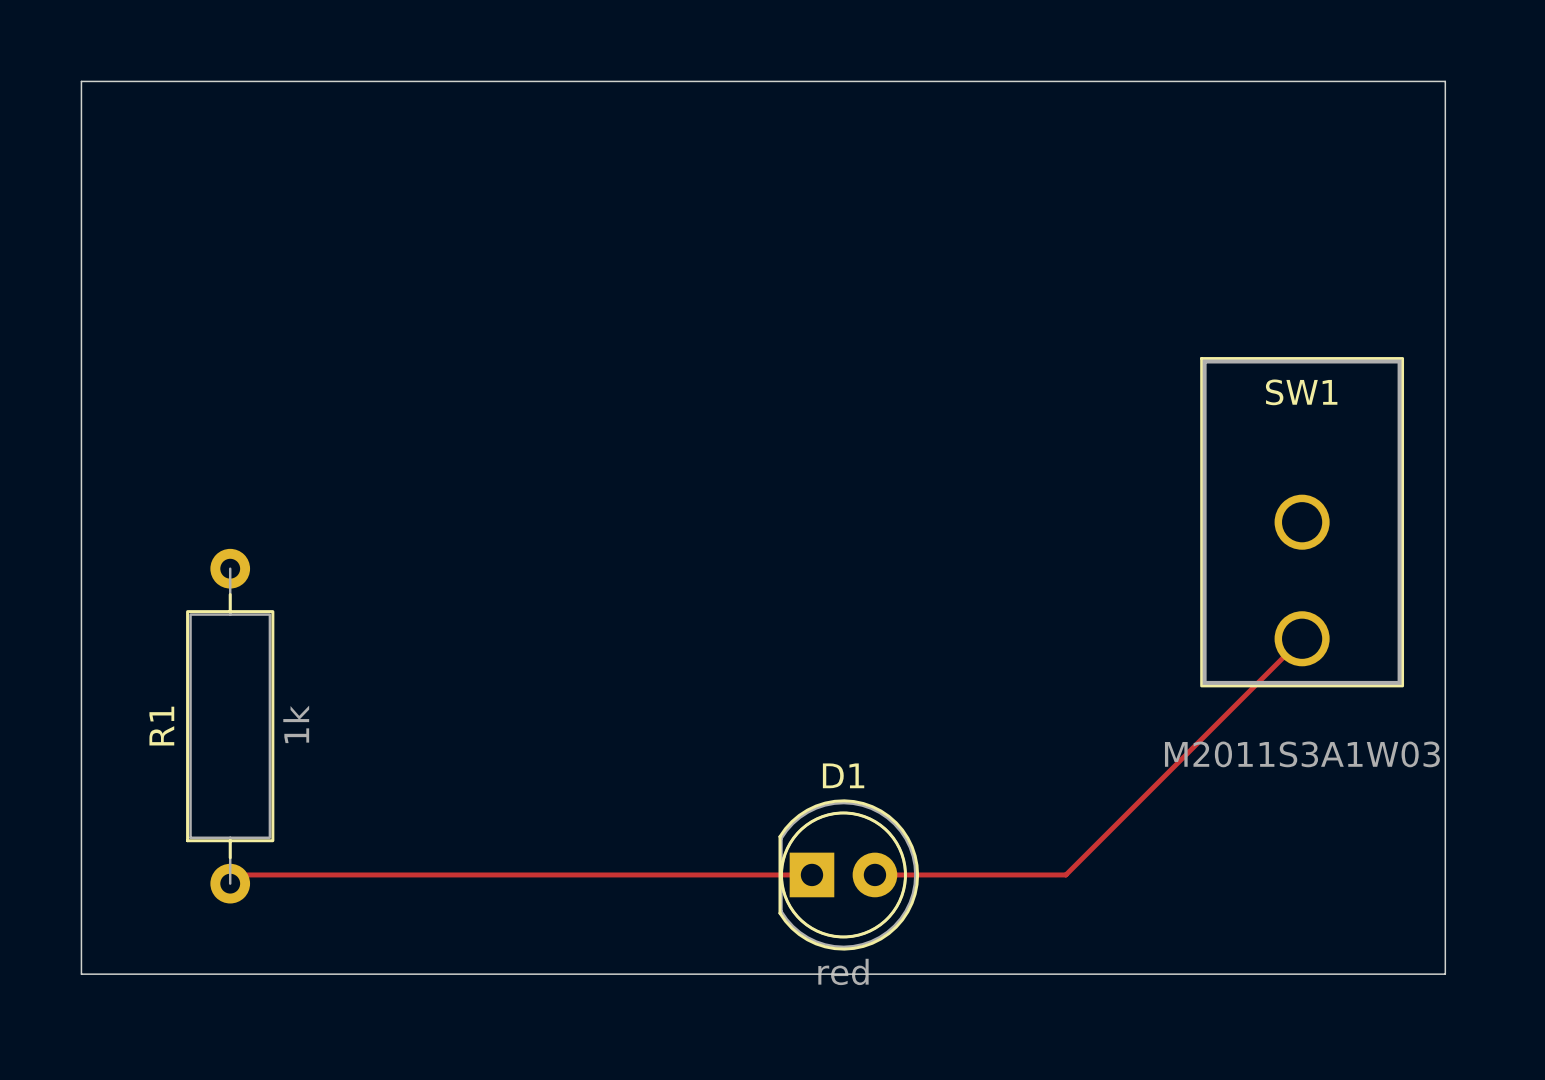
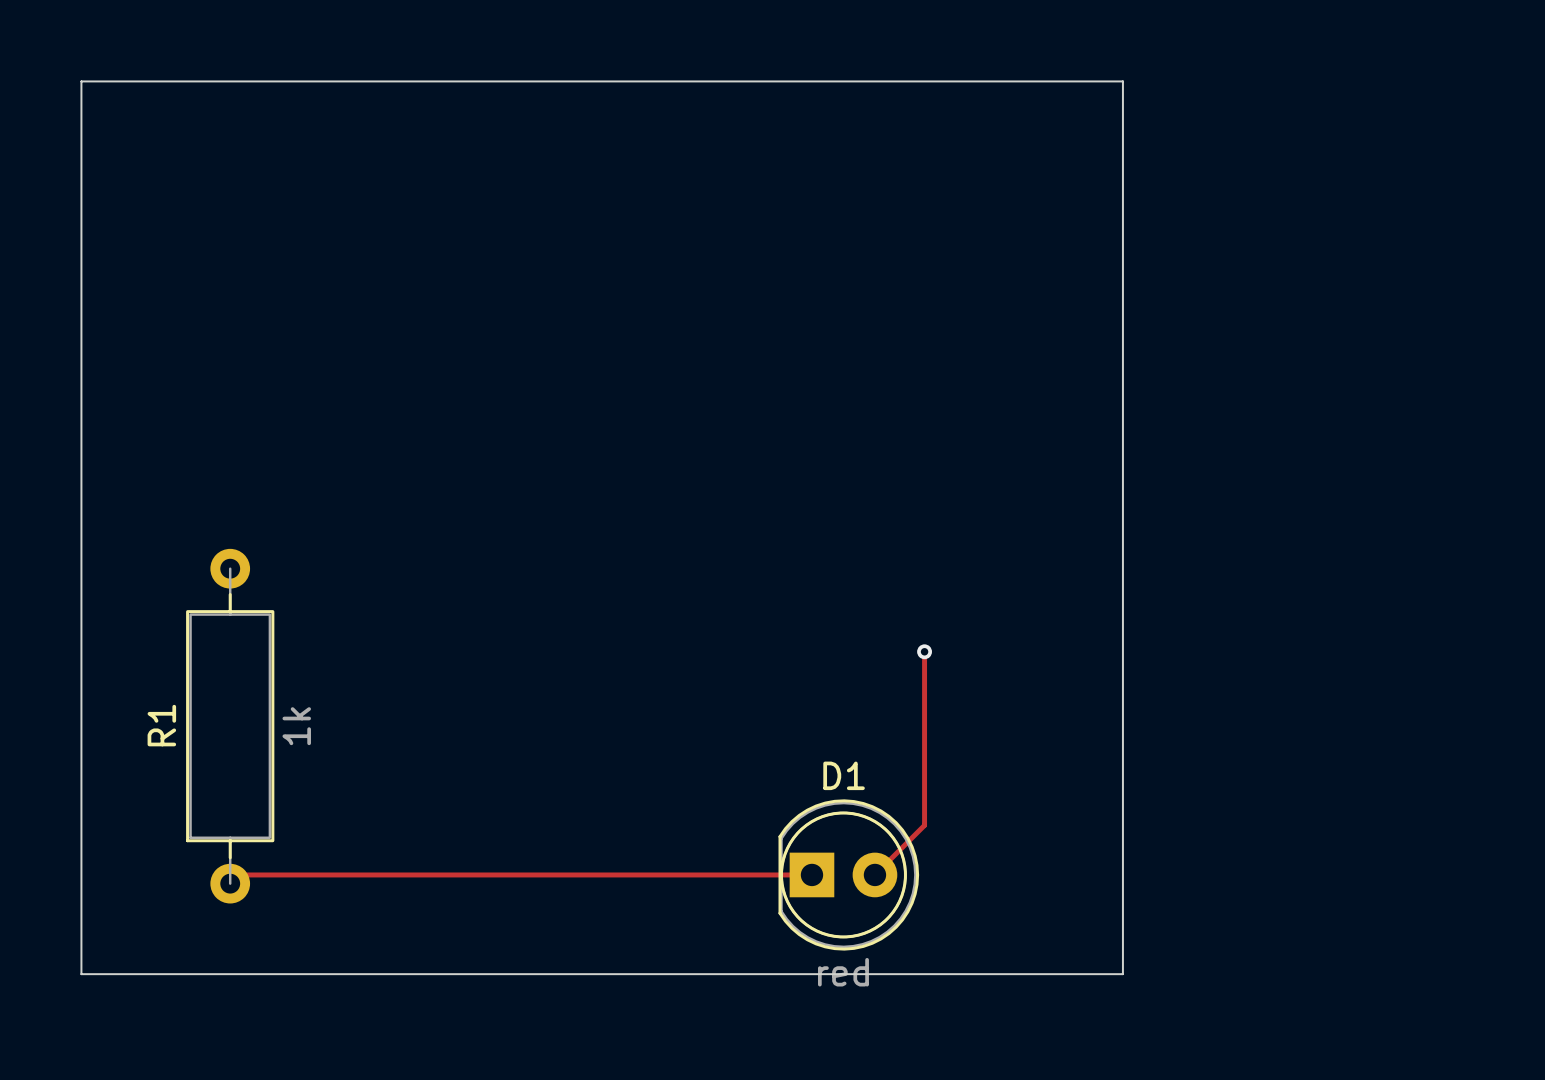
board edge: (1122, 81) (1445, 81) (1445, 974) (1122, 974) -> (1122, 81) (1122, 974)
SW1: M2011S3A1W03 (1302, 522) -> none
track: (1302, 638) (1065, 874) (874, 874) -> (924, 651) (924, 825) (874, 874)
via: none -> (924, 651)

